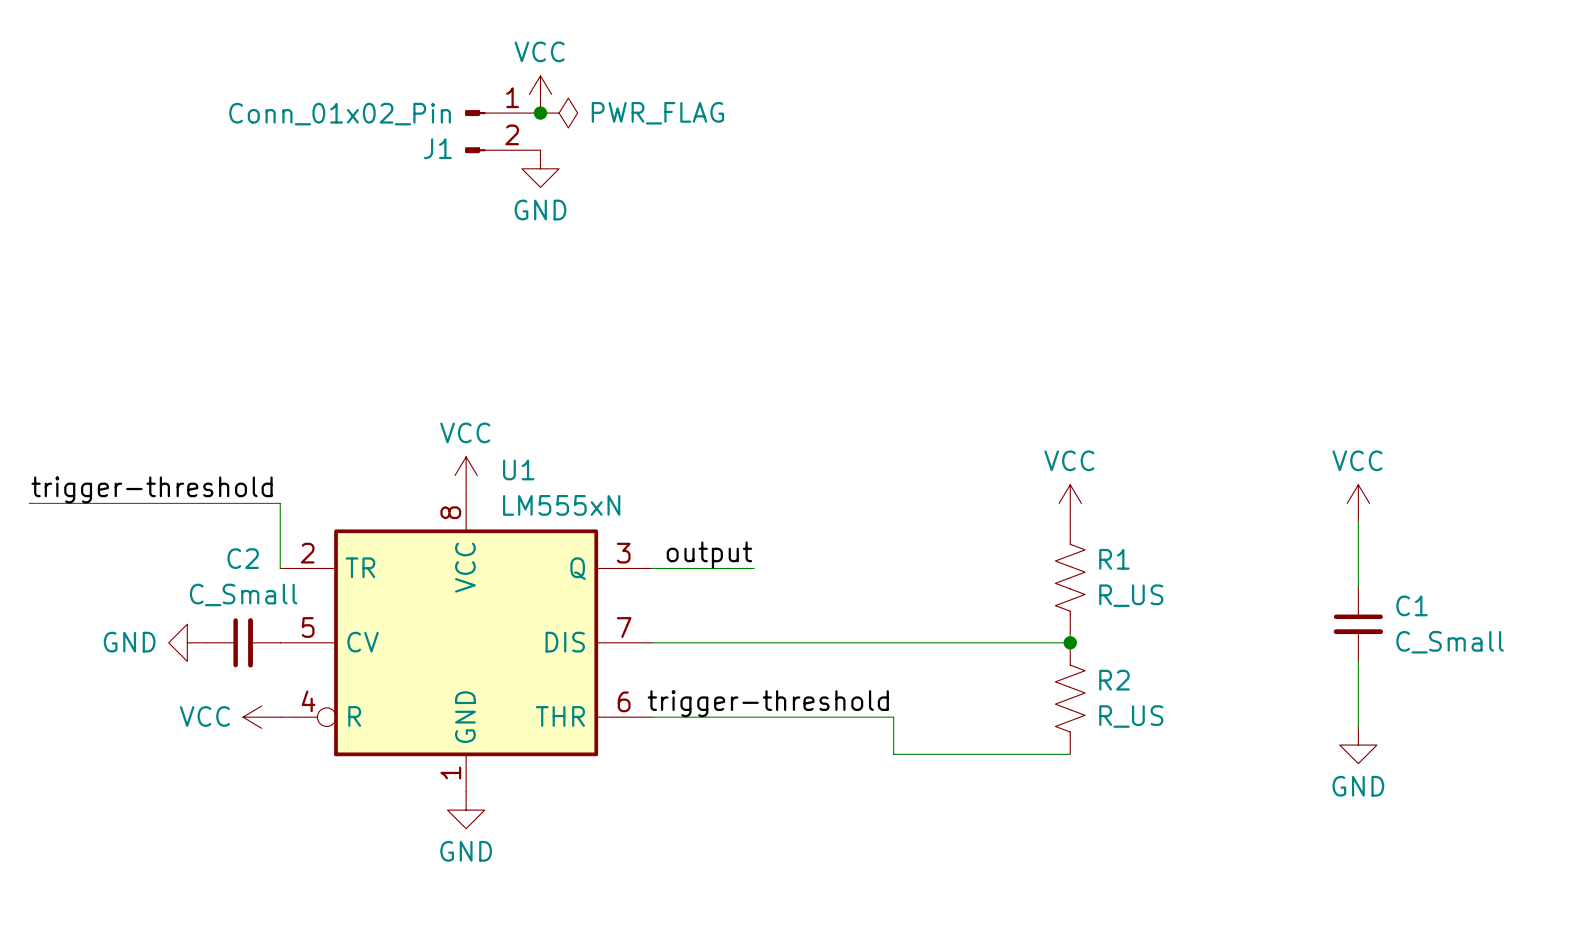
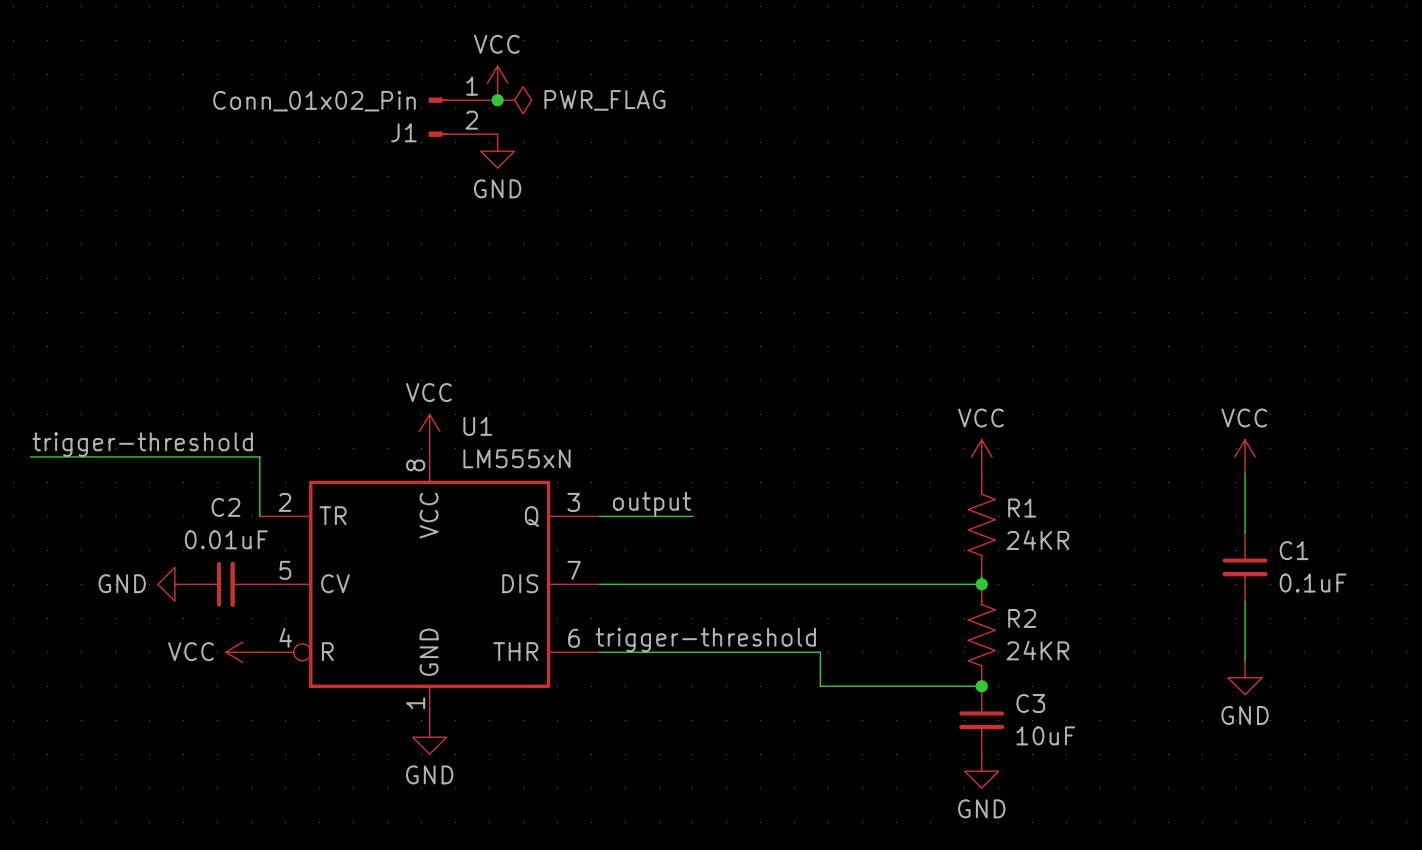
C2 value: C_Small (243, 594) -> 0.01uF (226, 539)
R1 value: R_US (1131, 595) -> 24KR (1037, 540)
C1 value: C_Small (1450, 642) -> 0.1uF (1313, 583)
R2 value: R_US (1131, 716) -> 24KR (1037, 650)
junction: none -> (981, 686)
C3: none -> 10uF (981, 720)
power symbol: none -> GND (981, 771)

